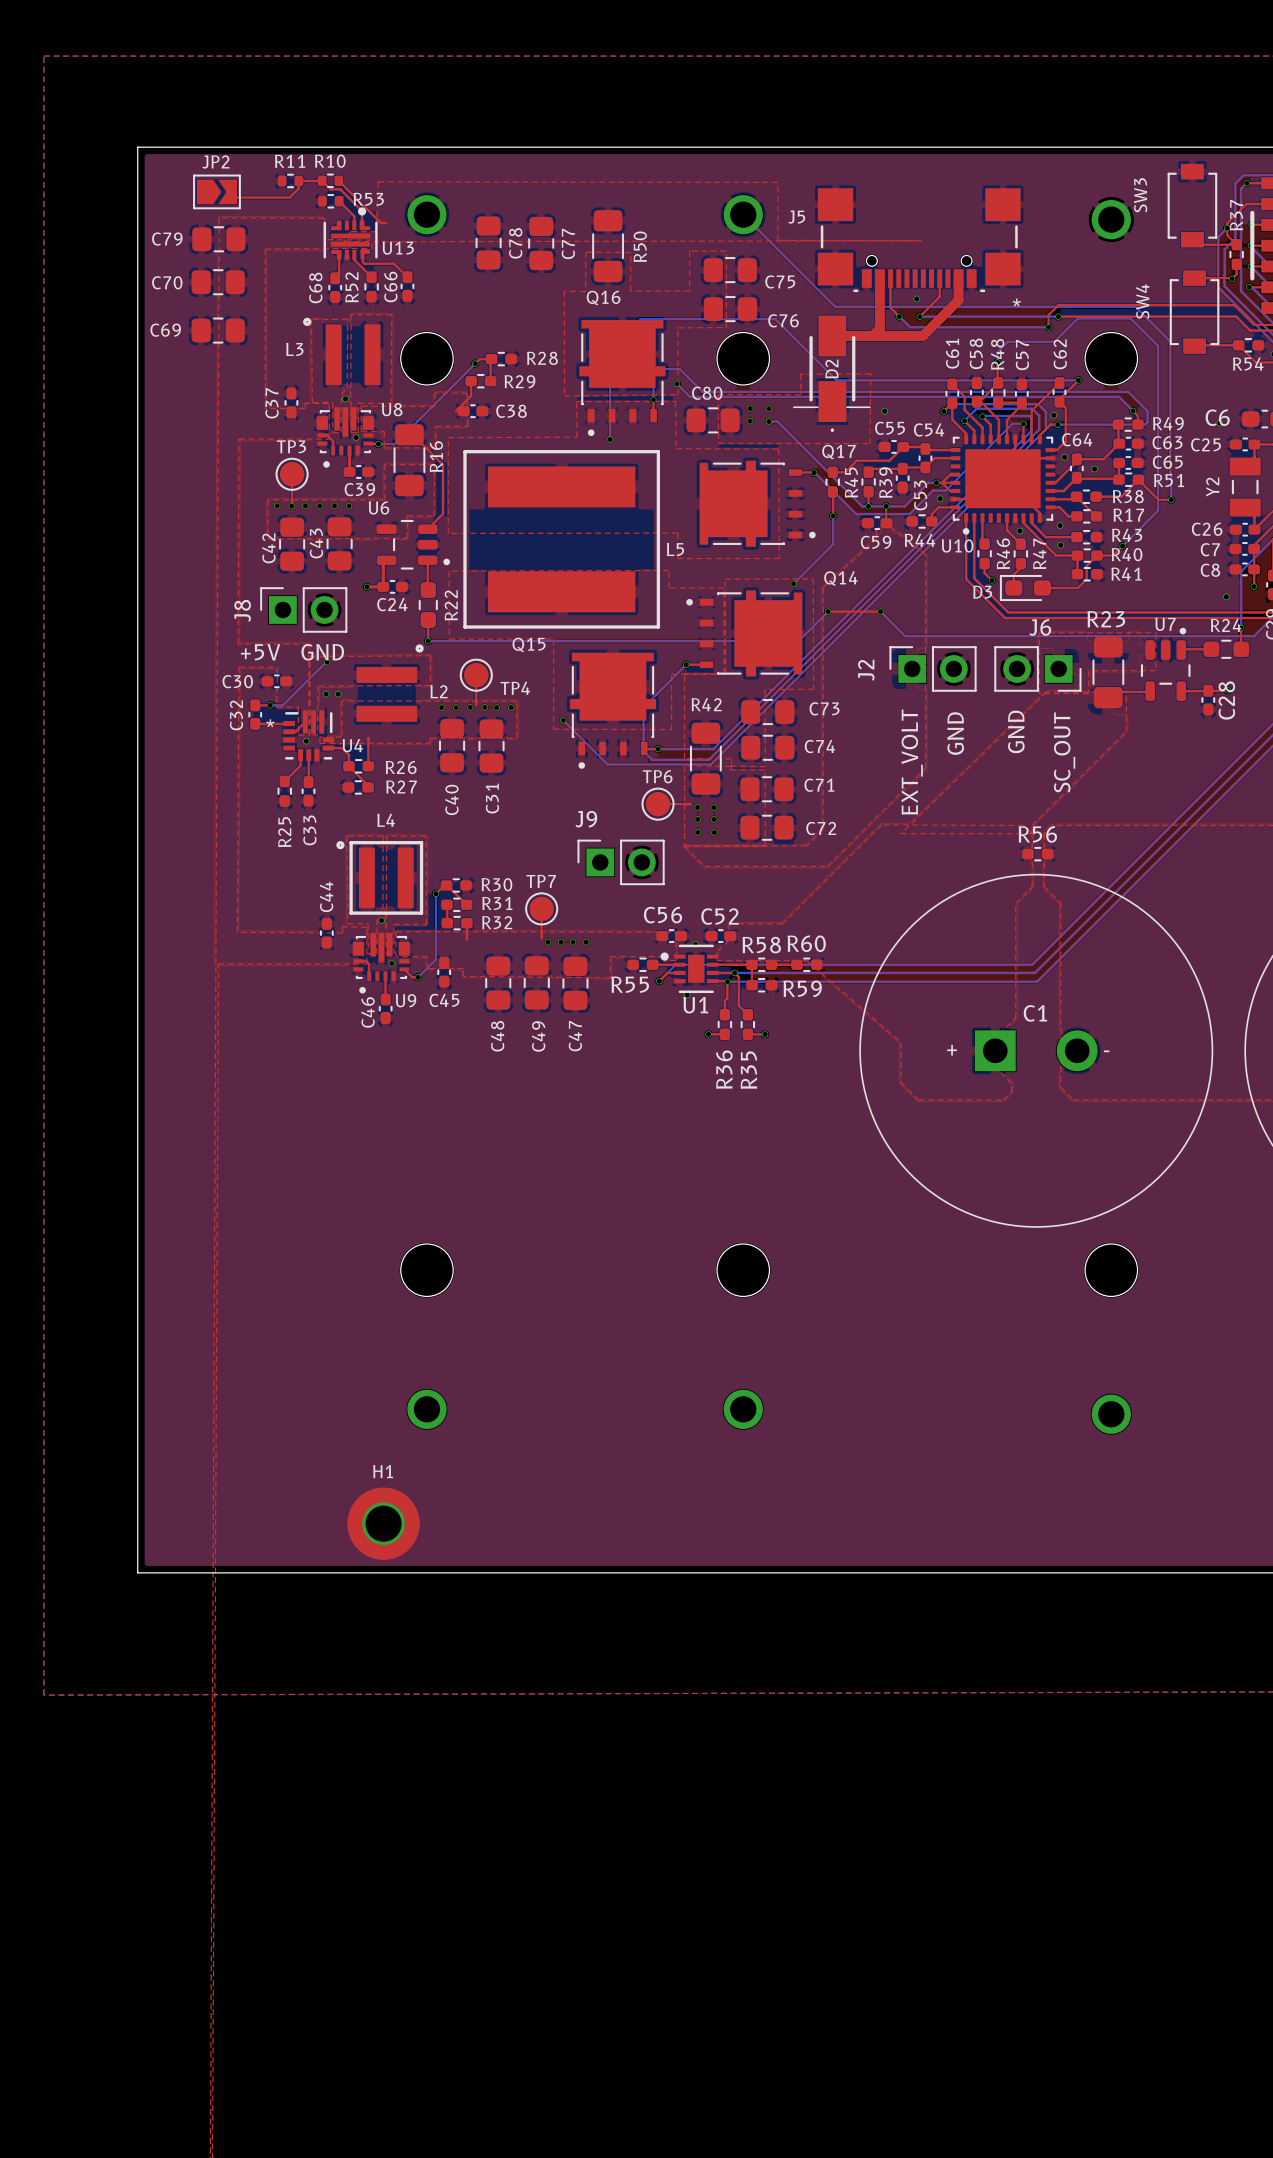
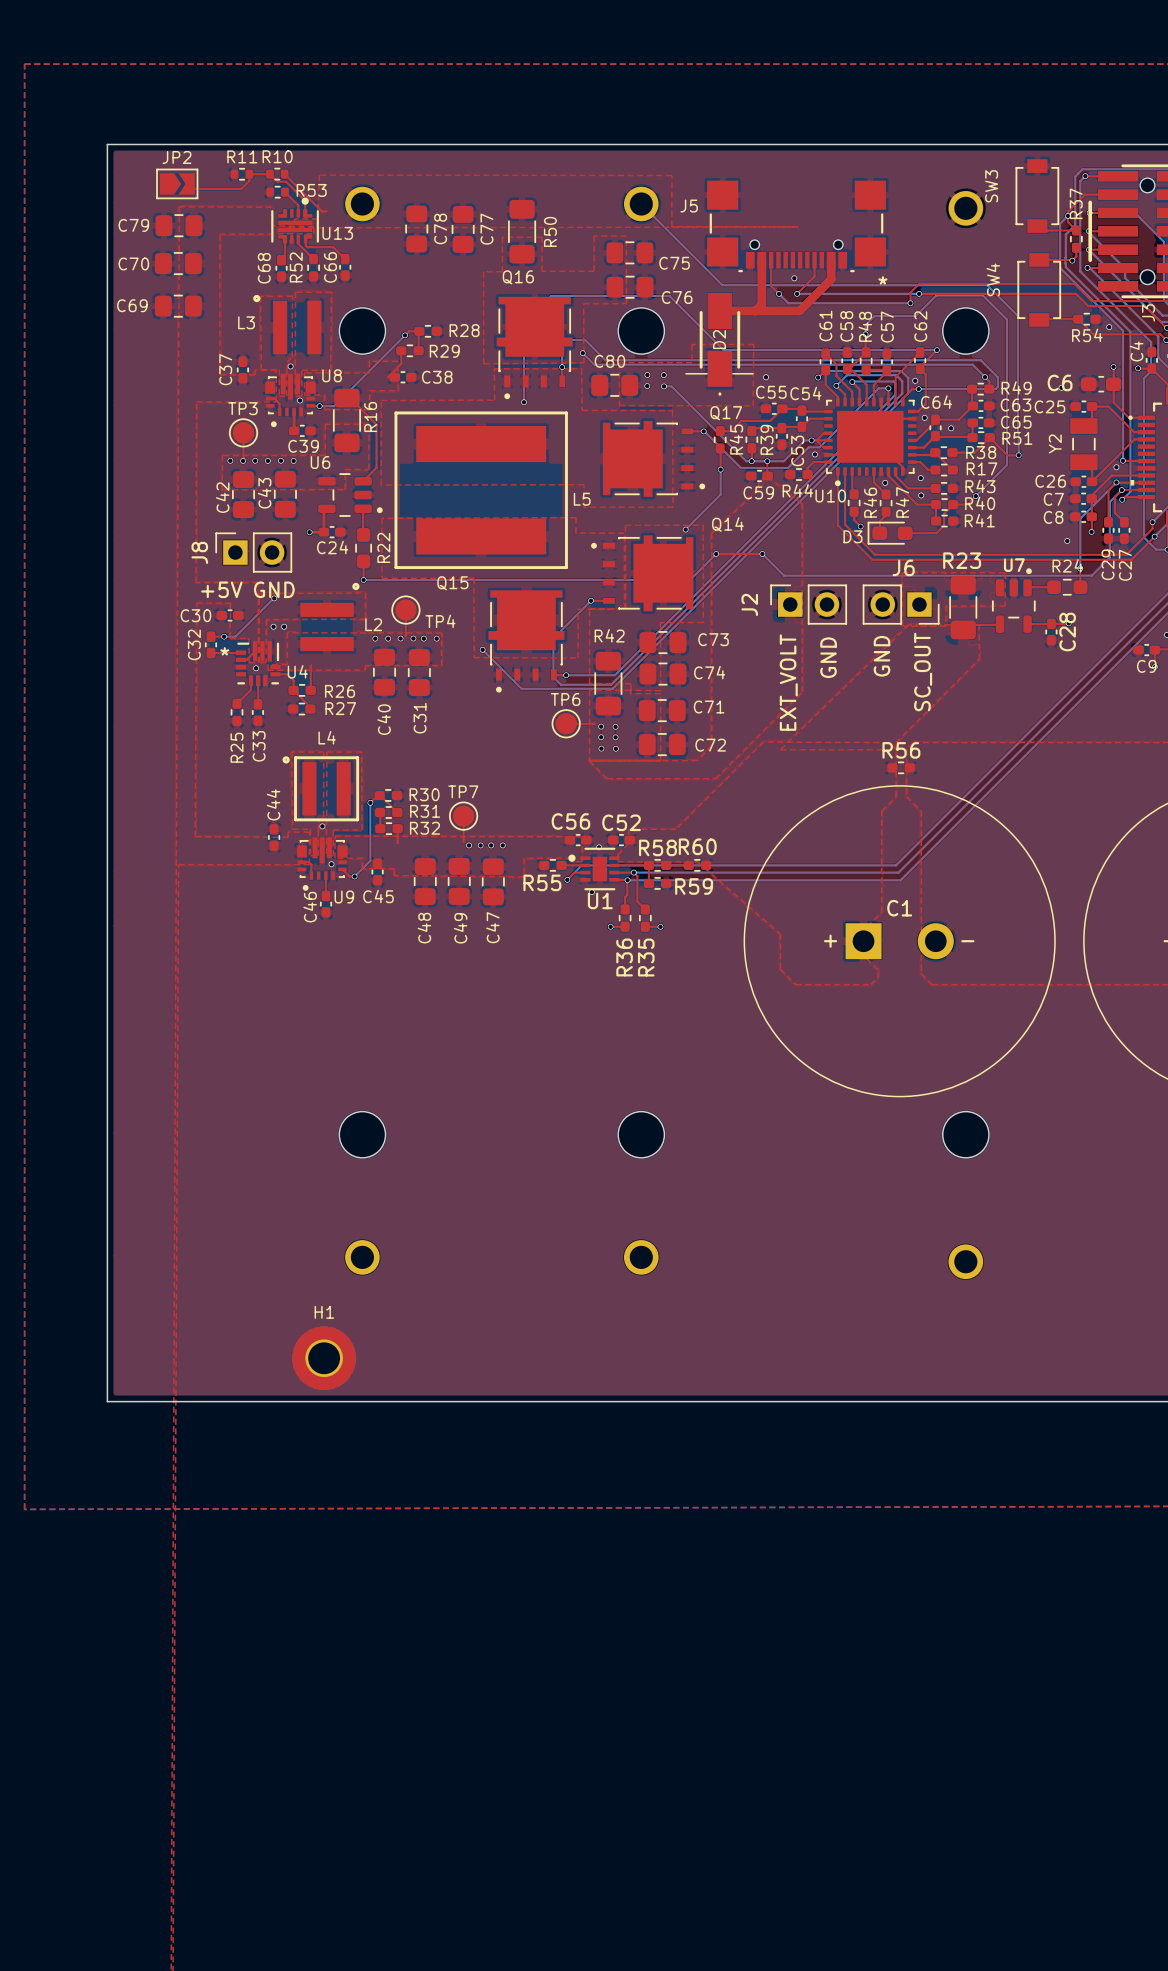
J9: (621, 862) -> none

